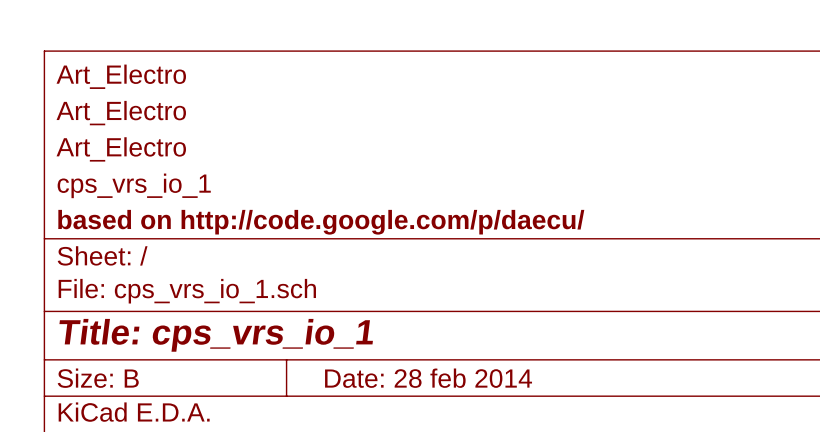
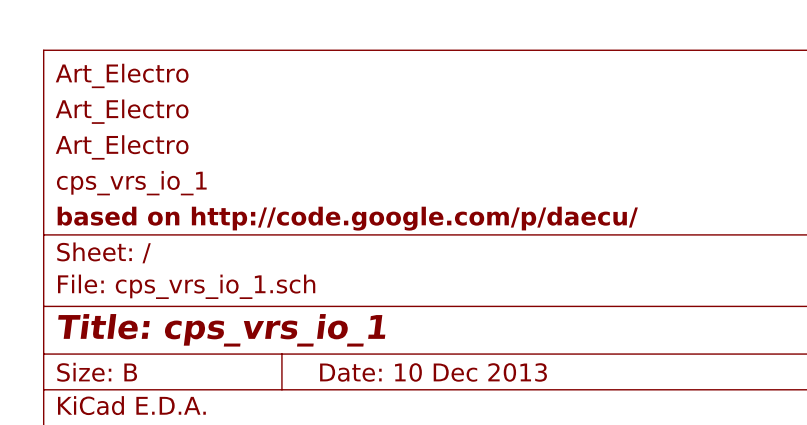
title block: Date: 28 feb 2014 (428, 378) -> Date: 10 Dec 2013 (433, 372)

